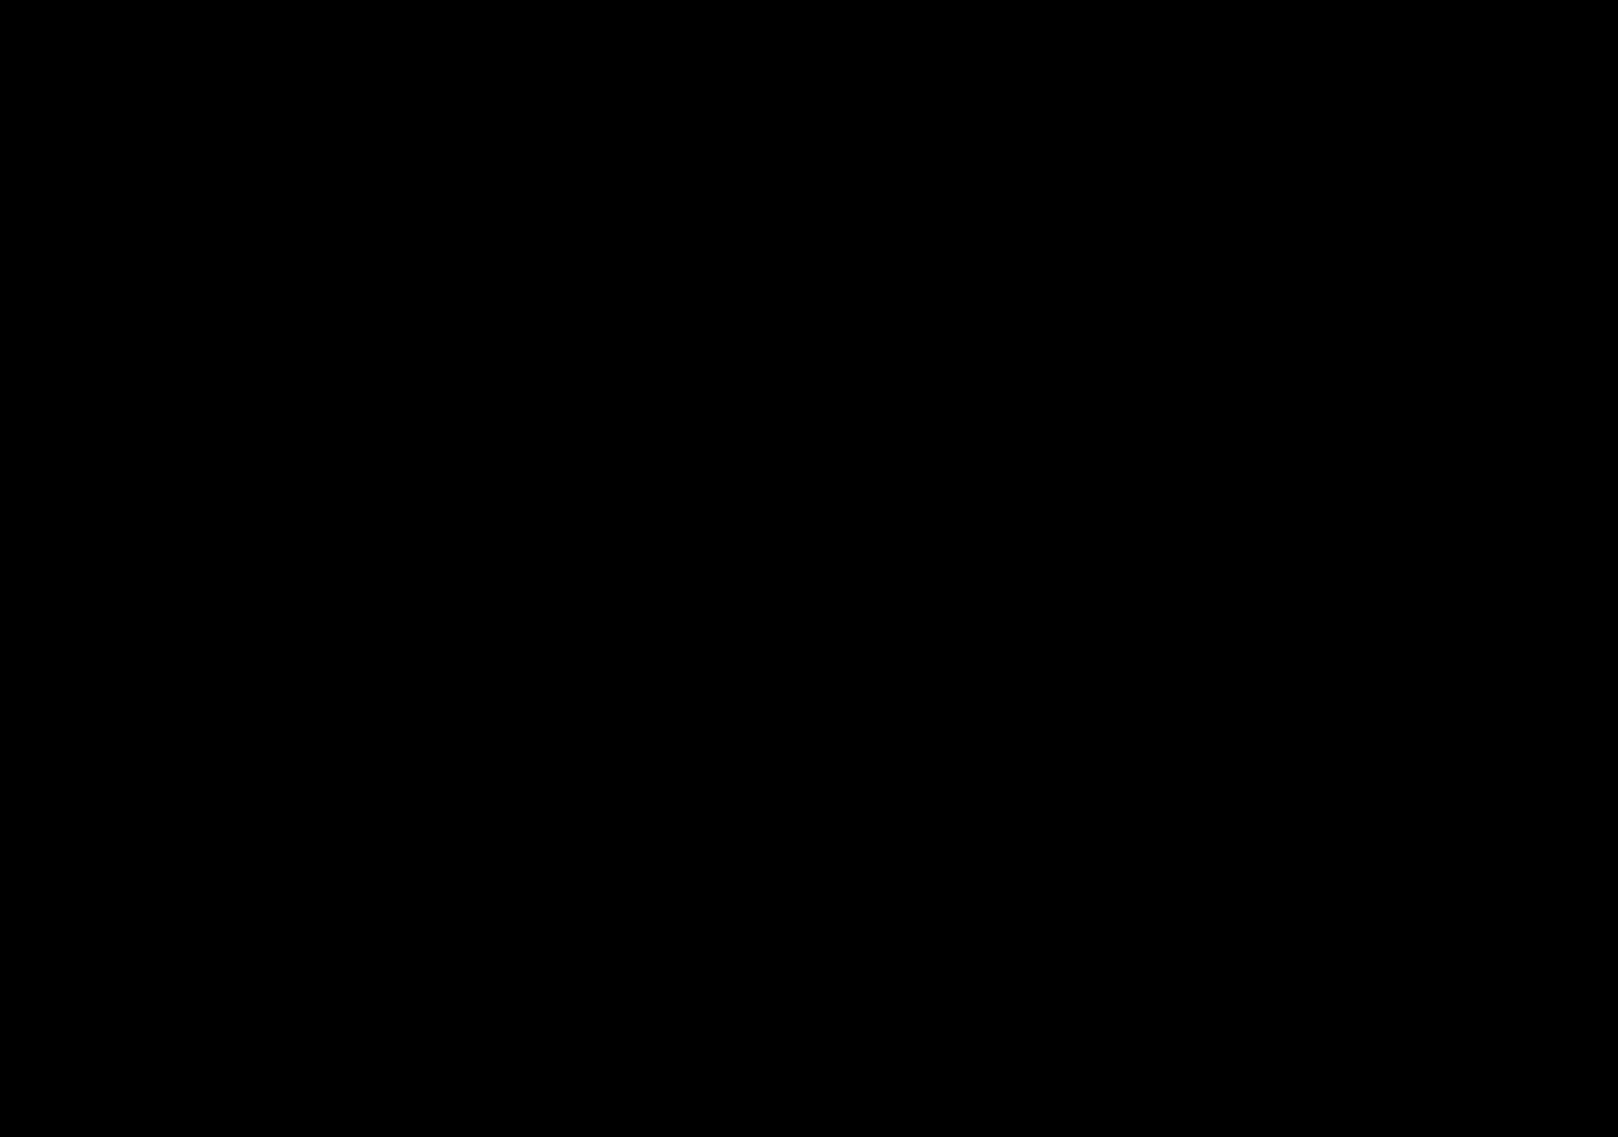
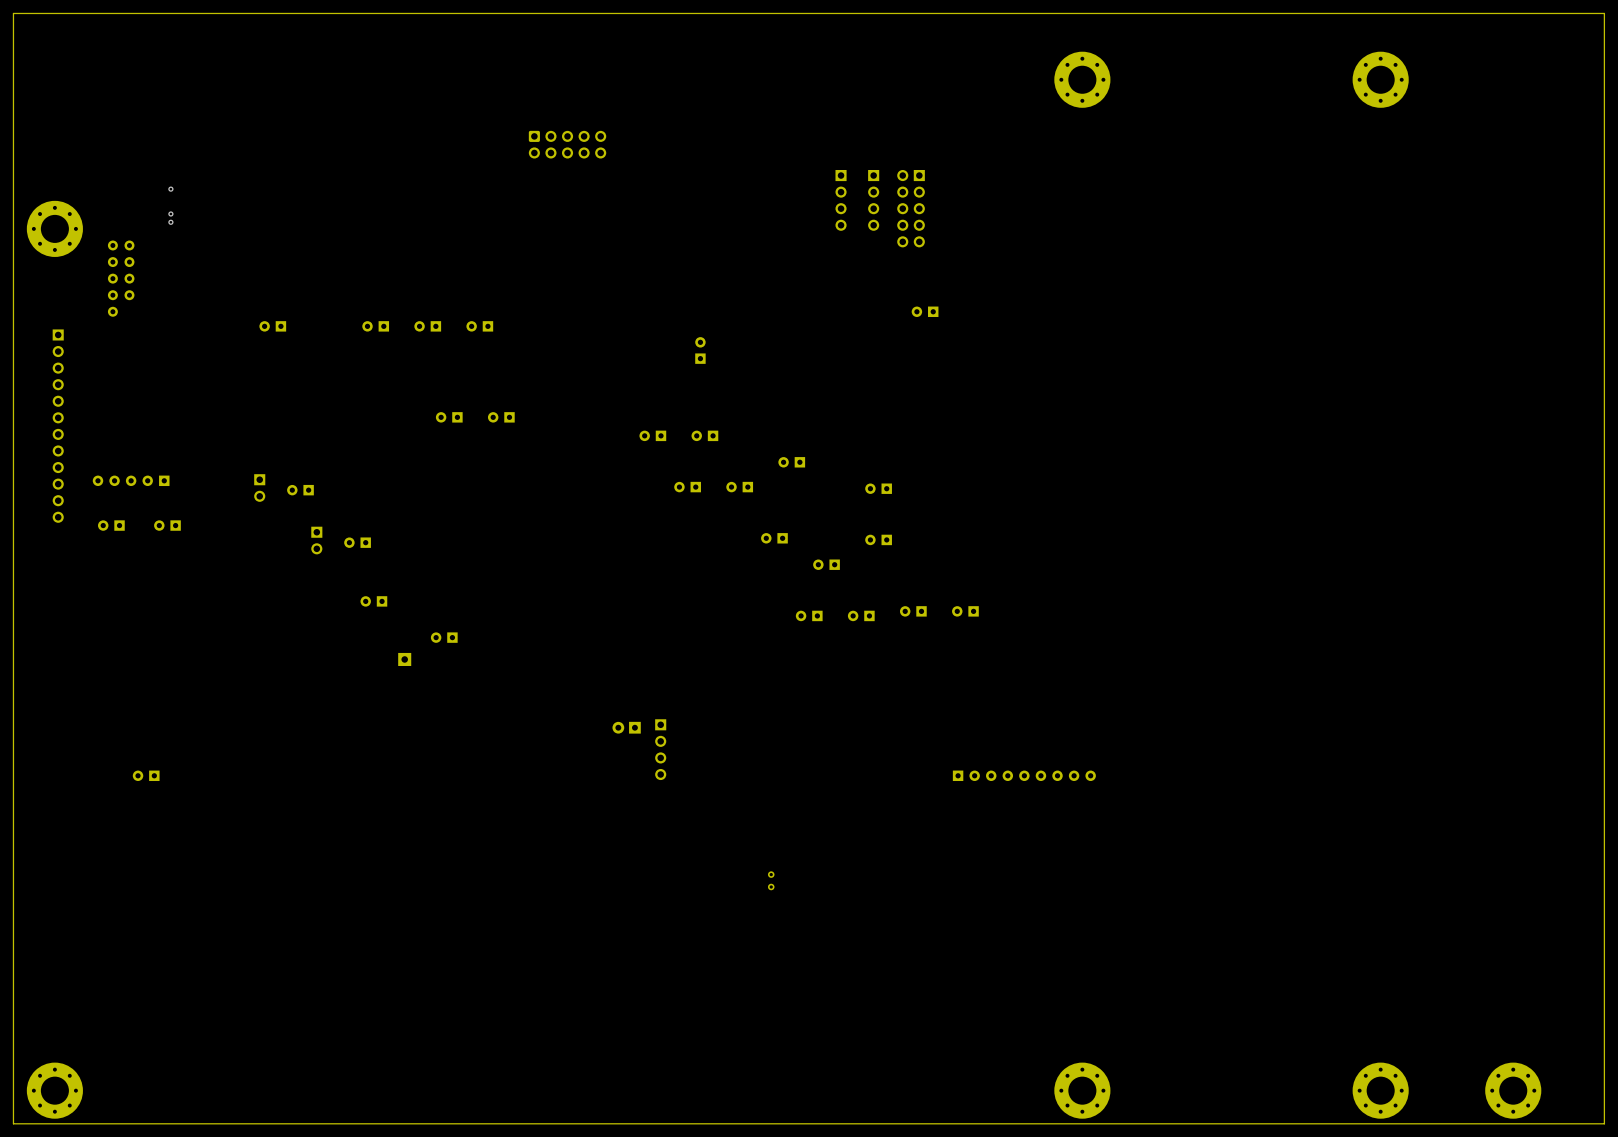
board edge: none -> (1604, 13) (1604, 1123) (13, 1123) (13, 13) (1604, 13)
part: none -> (1082, 79)
part: none -> (1380, 79)
part: none -> (567, 144)
via: none -> (170, 189)
part: none -> (841, 200)
part: none -> (873, 200)
part: none -> (911, 208)
via: none -> (170, 213)
via: none -> (170, 222)
part: none -> (54, 228)
part: none -> (121, 278)
part: none -> (925, 311)
part: none -> (272, 326)
part: none -> (375, 326)
part: none -> (427, 326)
part: none -> (479, 326)
part: none -> (700, 350)
part: none -> (449, 417)
part: none -> (501, 417)
part: none -> (58, 426)
part: none -> (652, 435)
part: none -> (704, 435)
part: none -> (791, 462)
part: none -> (131, 480)
part: none -> (687, 487)
part: none -> (739, 487)
part: none -> (259, 488)
part: none -> (878, 488)
part: none -> (300, 490)
part: none -> (111, 525)
part: none -> (167, 525)
part: none -> (774, 538)
part: none -> (878, 539)
part: none -> (316, 540)
part: none -> (357, 542)
part: none -> (826, 564)
part: none -> (373, 601)
part: none -> (913, 611)
part: none -> (965, 611)
part: none -> (809, 615)
part: none -> (861, 615)
part: none -> (444, 637)
part: none -> (404, 659)
part: none -> (626, 727)
part: none -> (660, 749)
part: none -> (146, 775)
part: none -> (1024, 775)
part: none -> (771, 880)
part: none -> (54, 1090)
part: none -> (1082, 1090)
part: none -> (1380, 1090)
part: none -> (1513, 1090)

